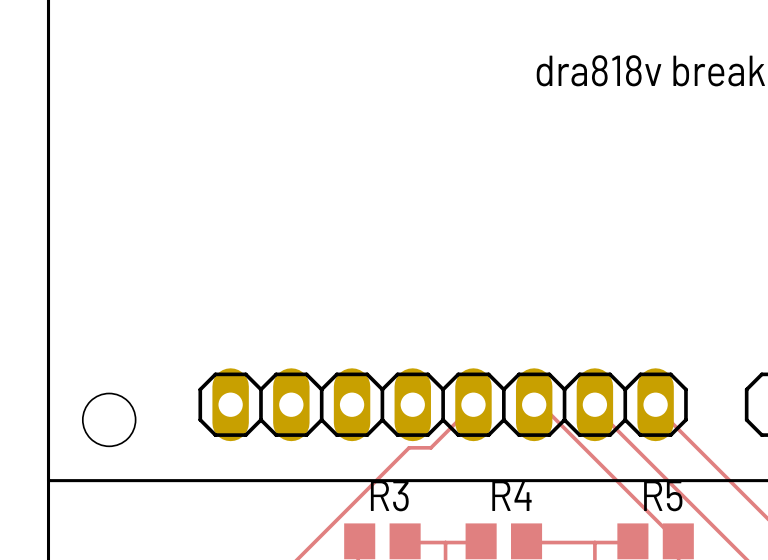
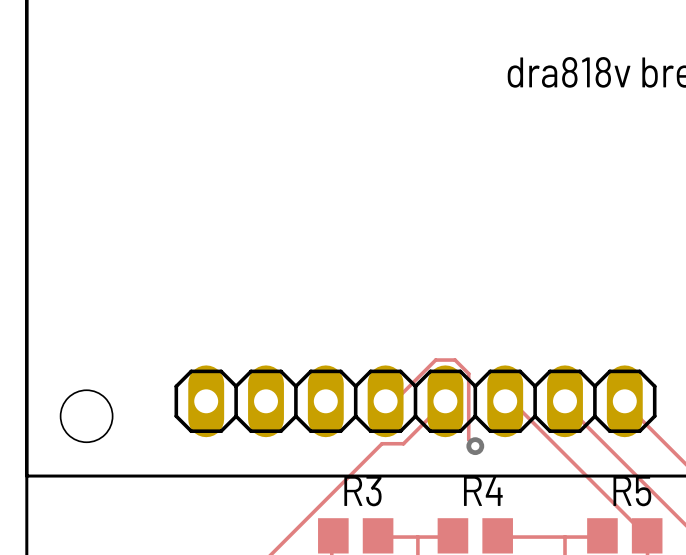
track: none -> (385, 401) (394, 401) (435, 360) (455, 360) (468, 373) (468, 439) (475, 446)
via: none -> (475, 446)

